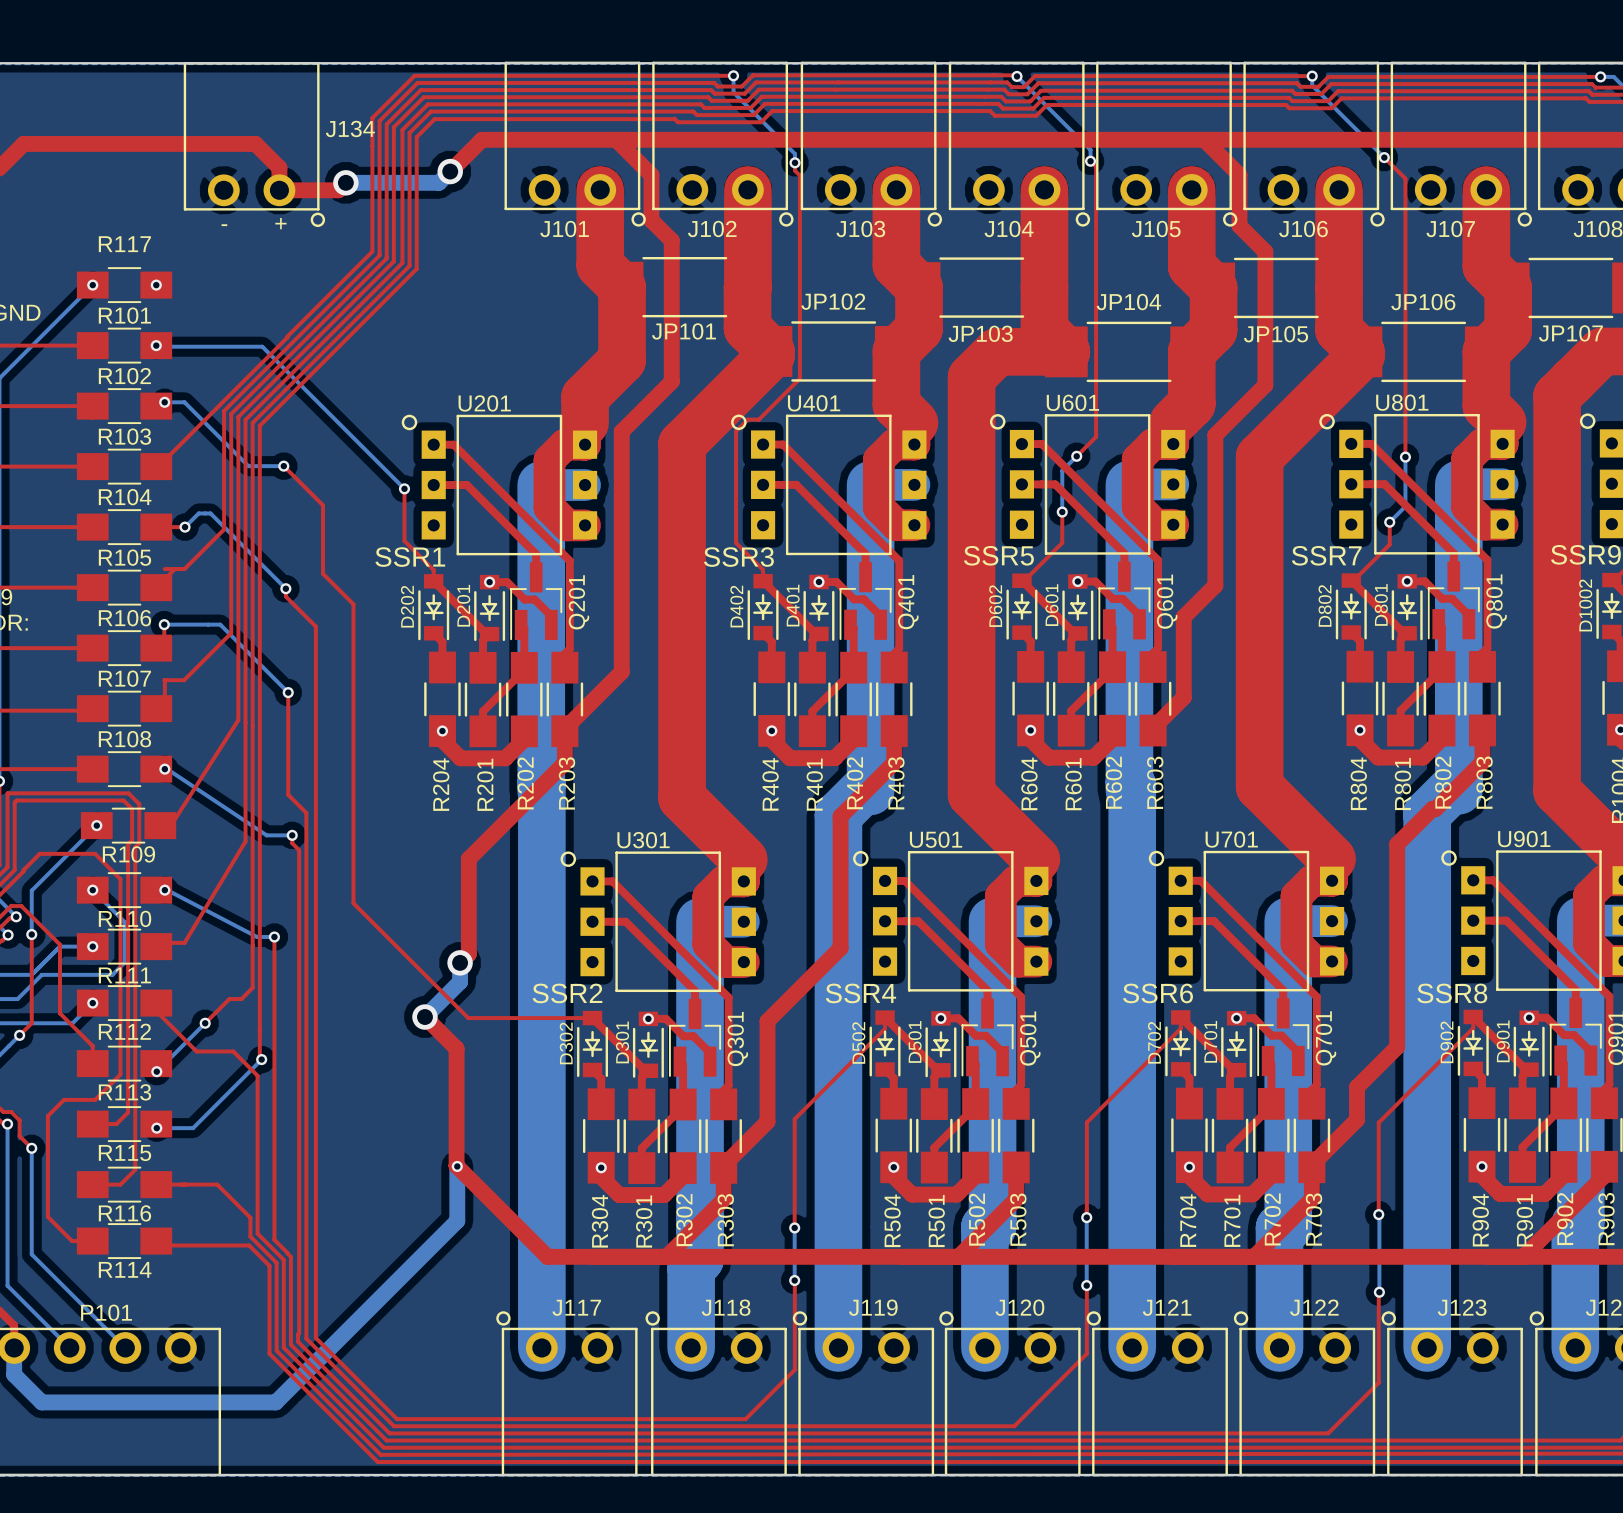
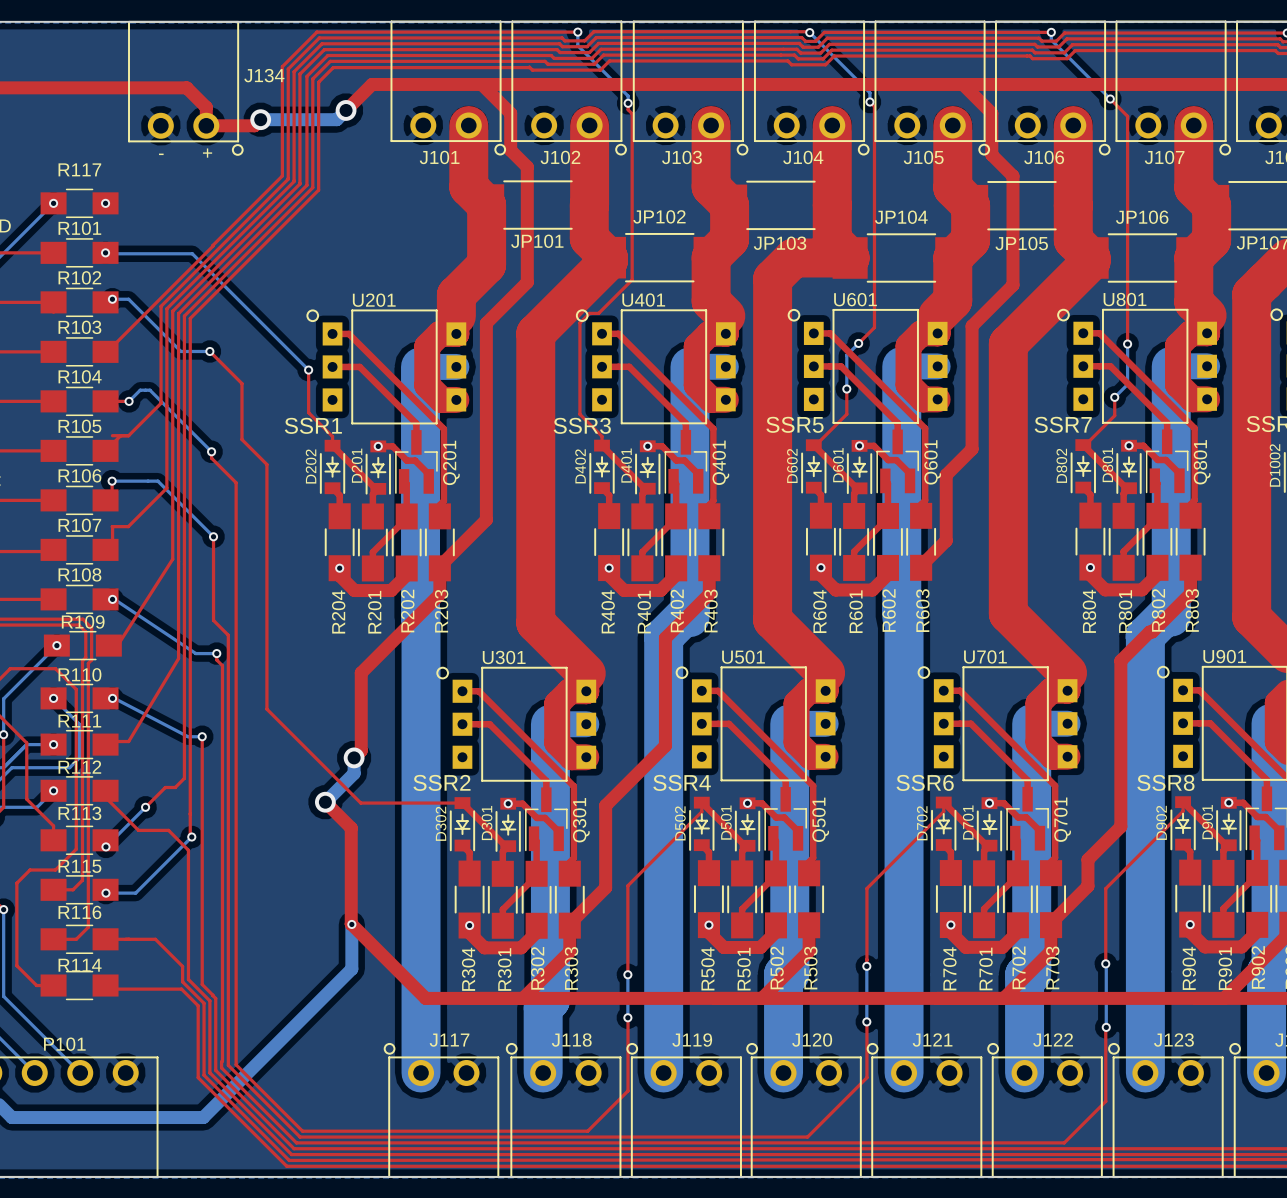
R109 name position: R109 (128, 854) -> R109 (83, 622)
R110 name position: R110 (125, 918) -> R110 (79, 674)
R111 name position: R111 (124, 975) -> R111 (79, 721)
R112 name position: R112 (124, 1031) -> R112 (79, 767)
R113 name position: R113 (124, 1092) -> R113 (79, 813)
R115 name position: R115 (124, 1153) -> R115 (79, 866)
R116 name position: R116 (124, 1213) -> R116 (79, 912)
R114 name position: R114 (125, 1269) -> R114 (80, 965)

